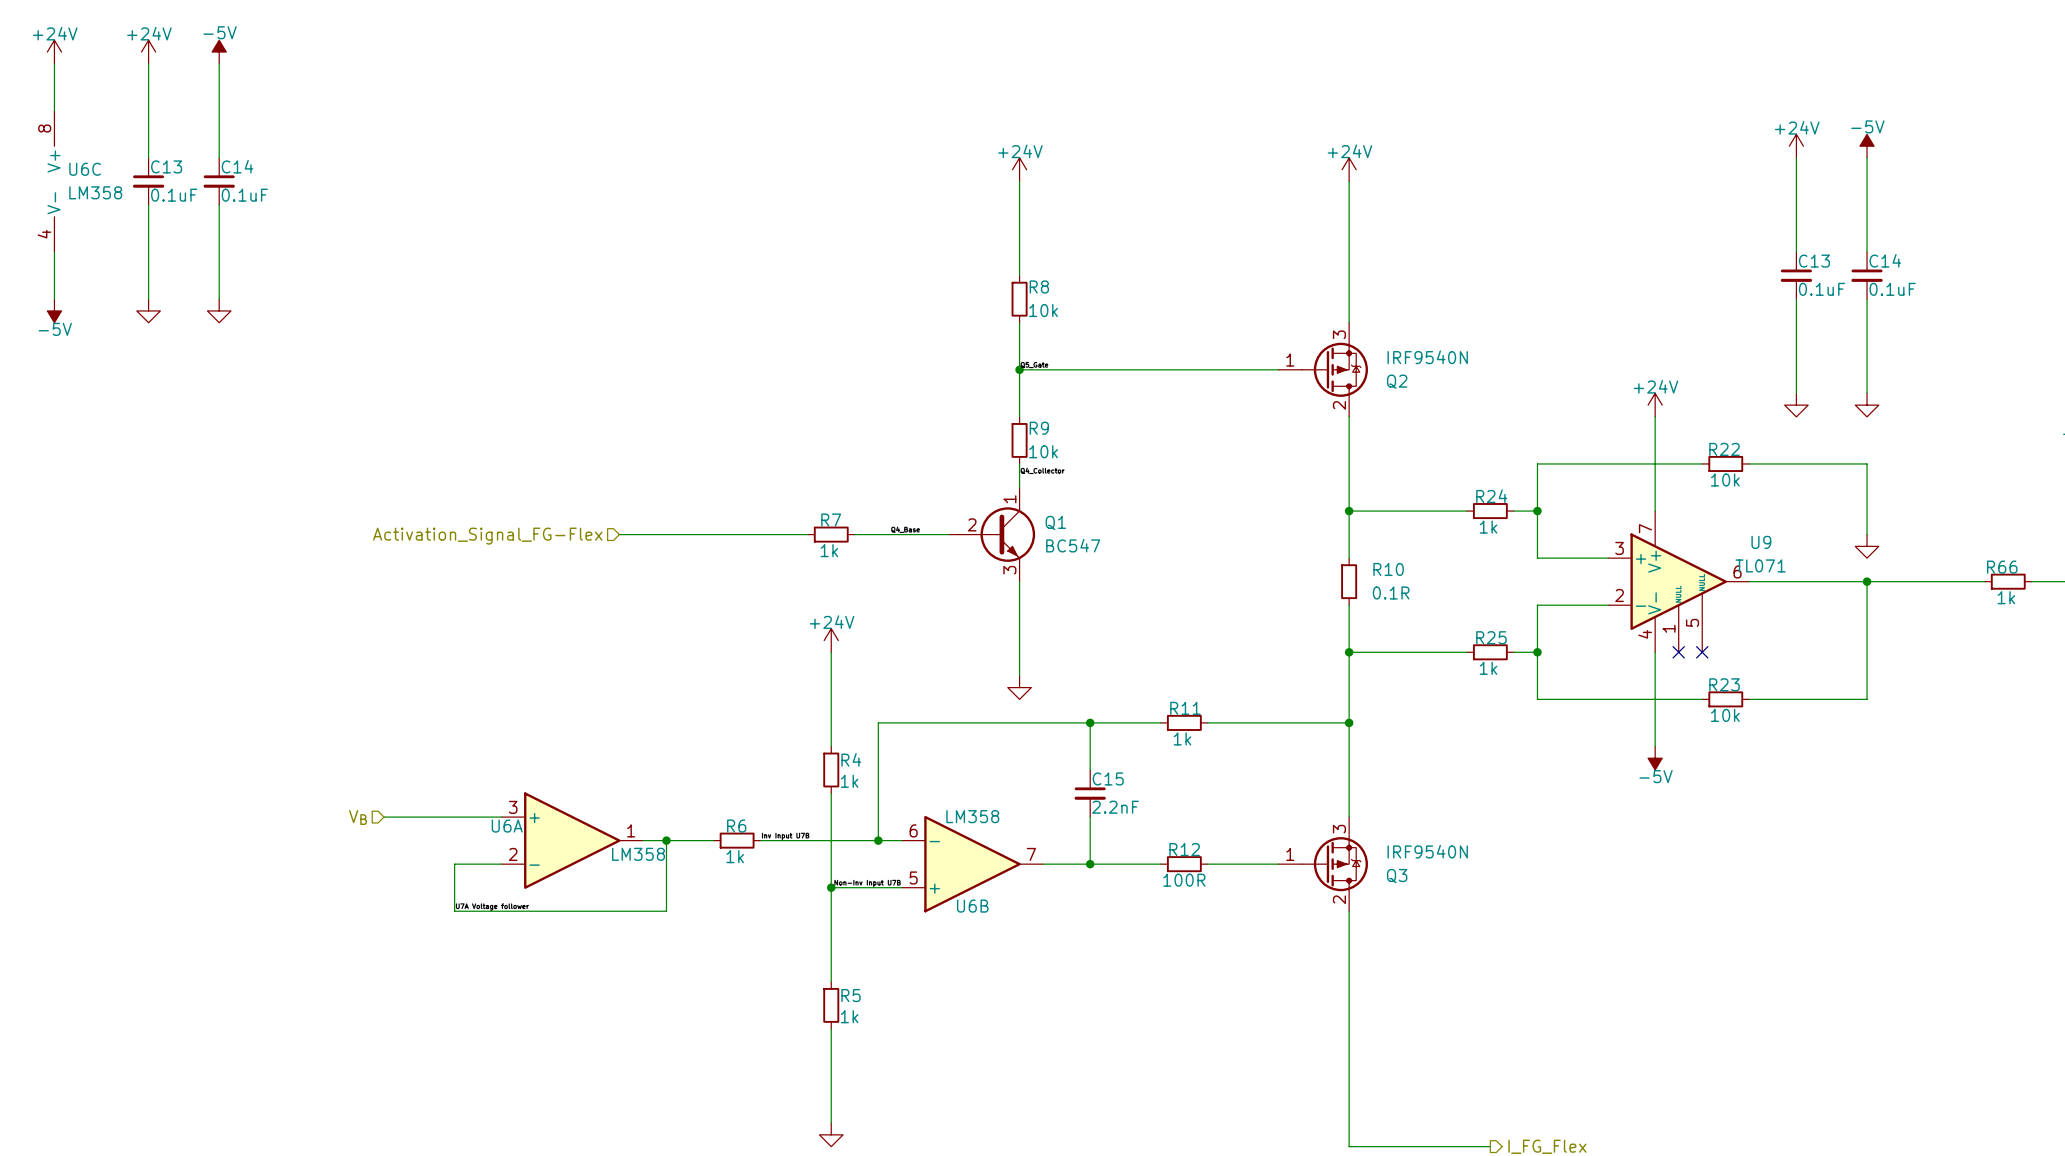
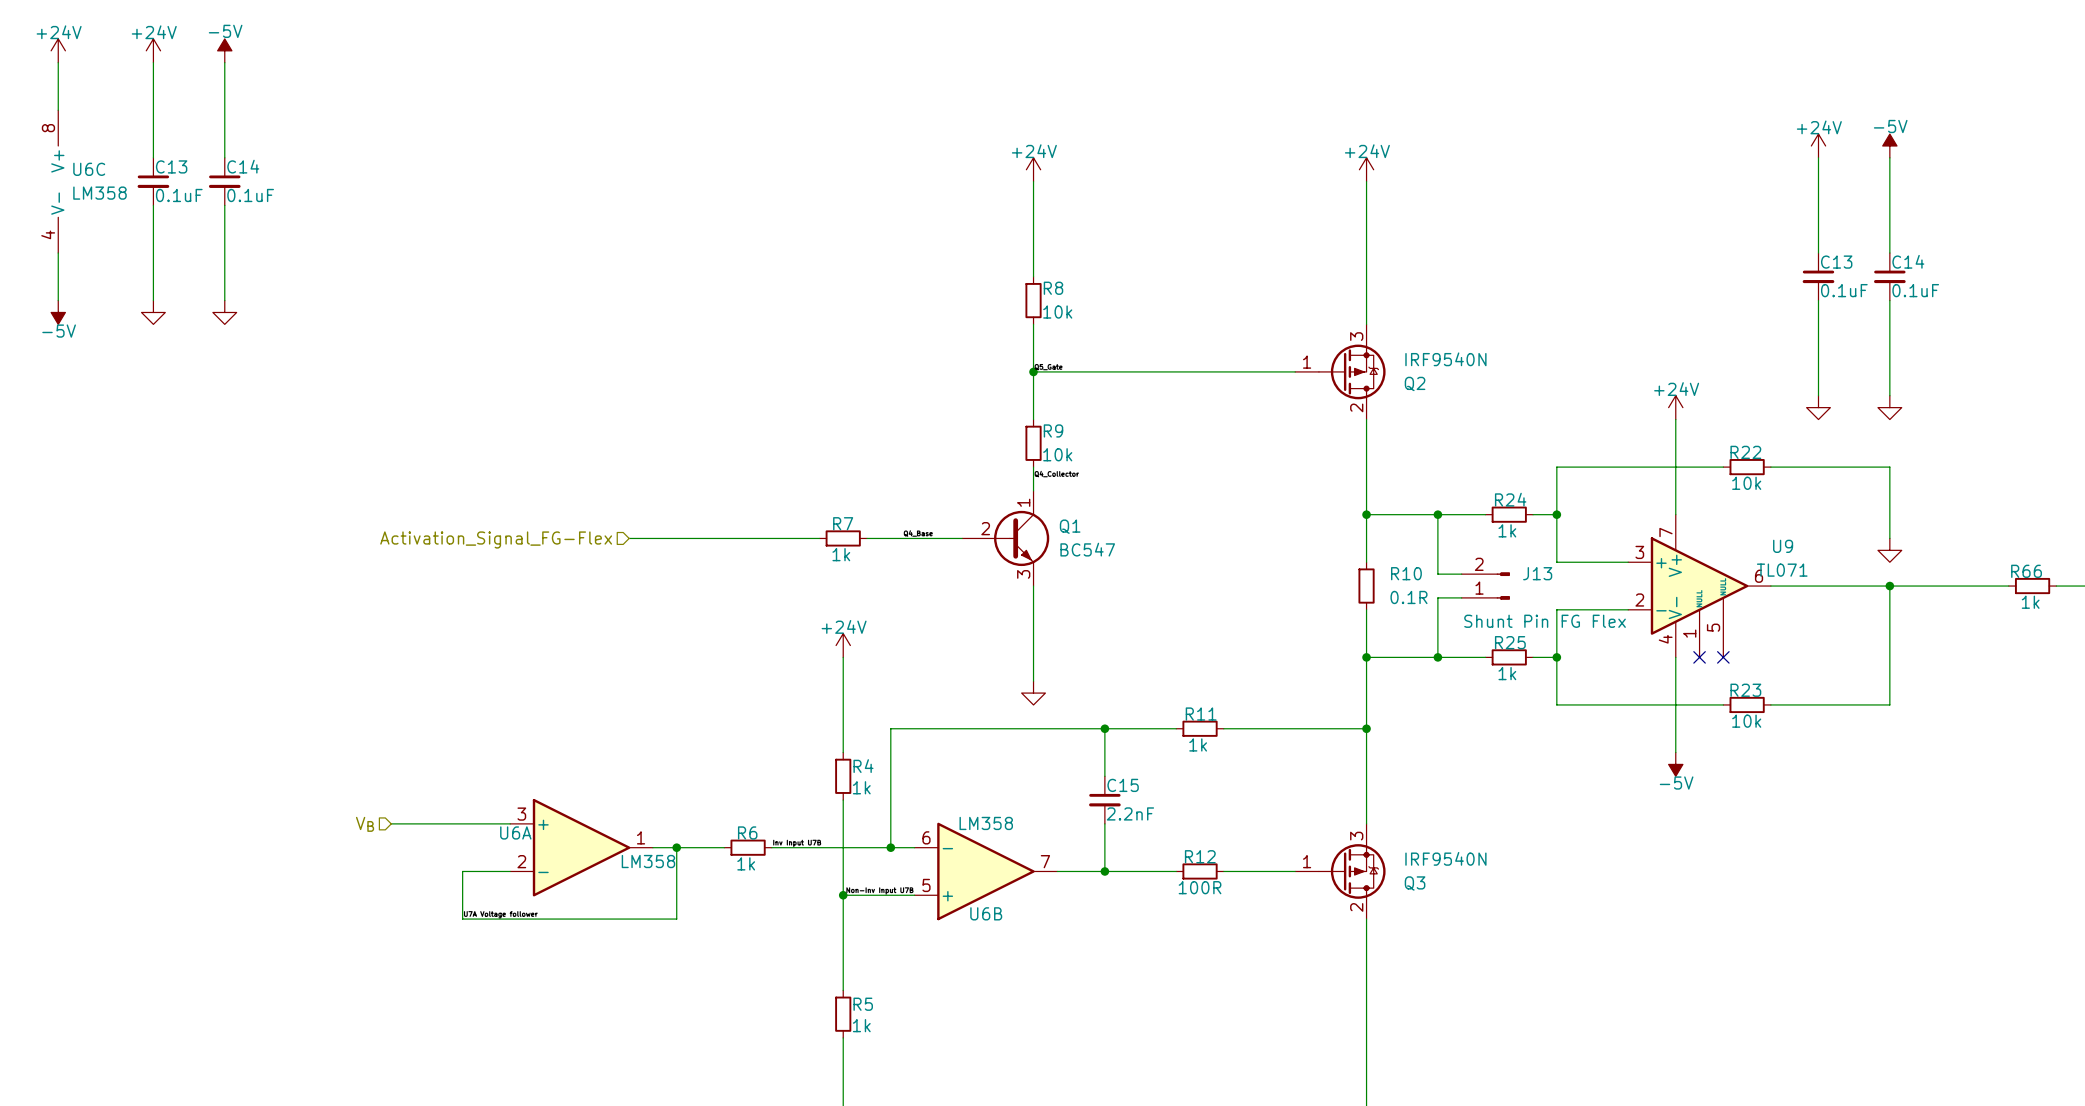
wire: none -> (1437, 514) (1437, 574) (1461, 574)
junction: none -> (1437, 514)
J13: none -> Shunt Pin FG Flex (1485, 586)
wire: none -> (1461, 597) (1437, 597) (1437, 657)
junction: none -> (1437, 657)

